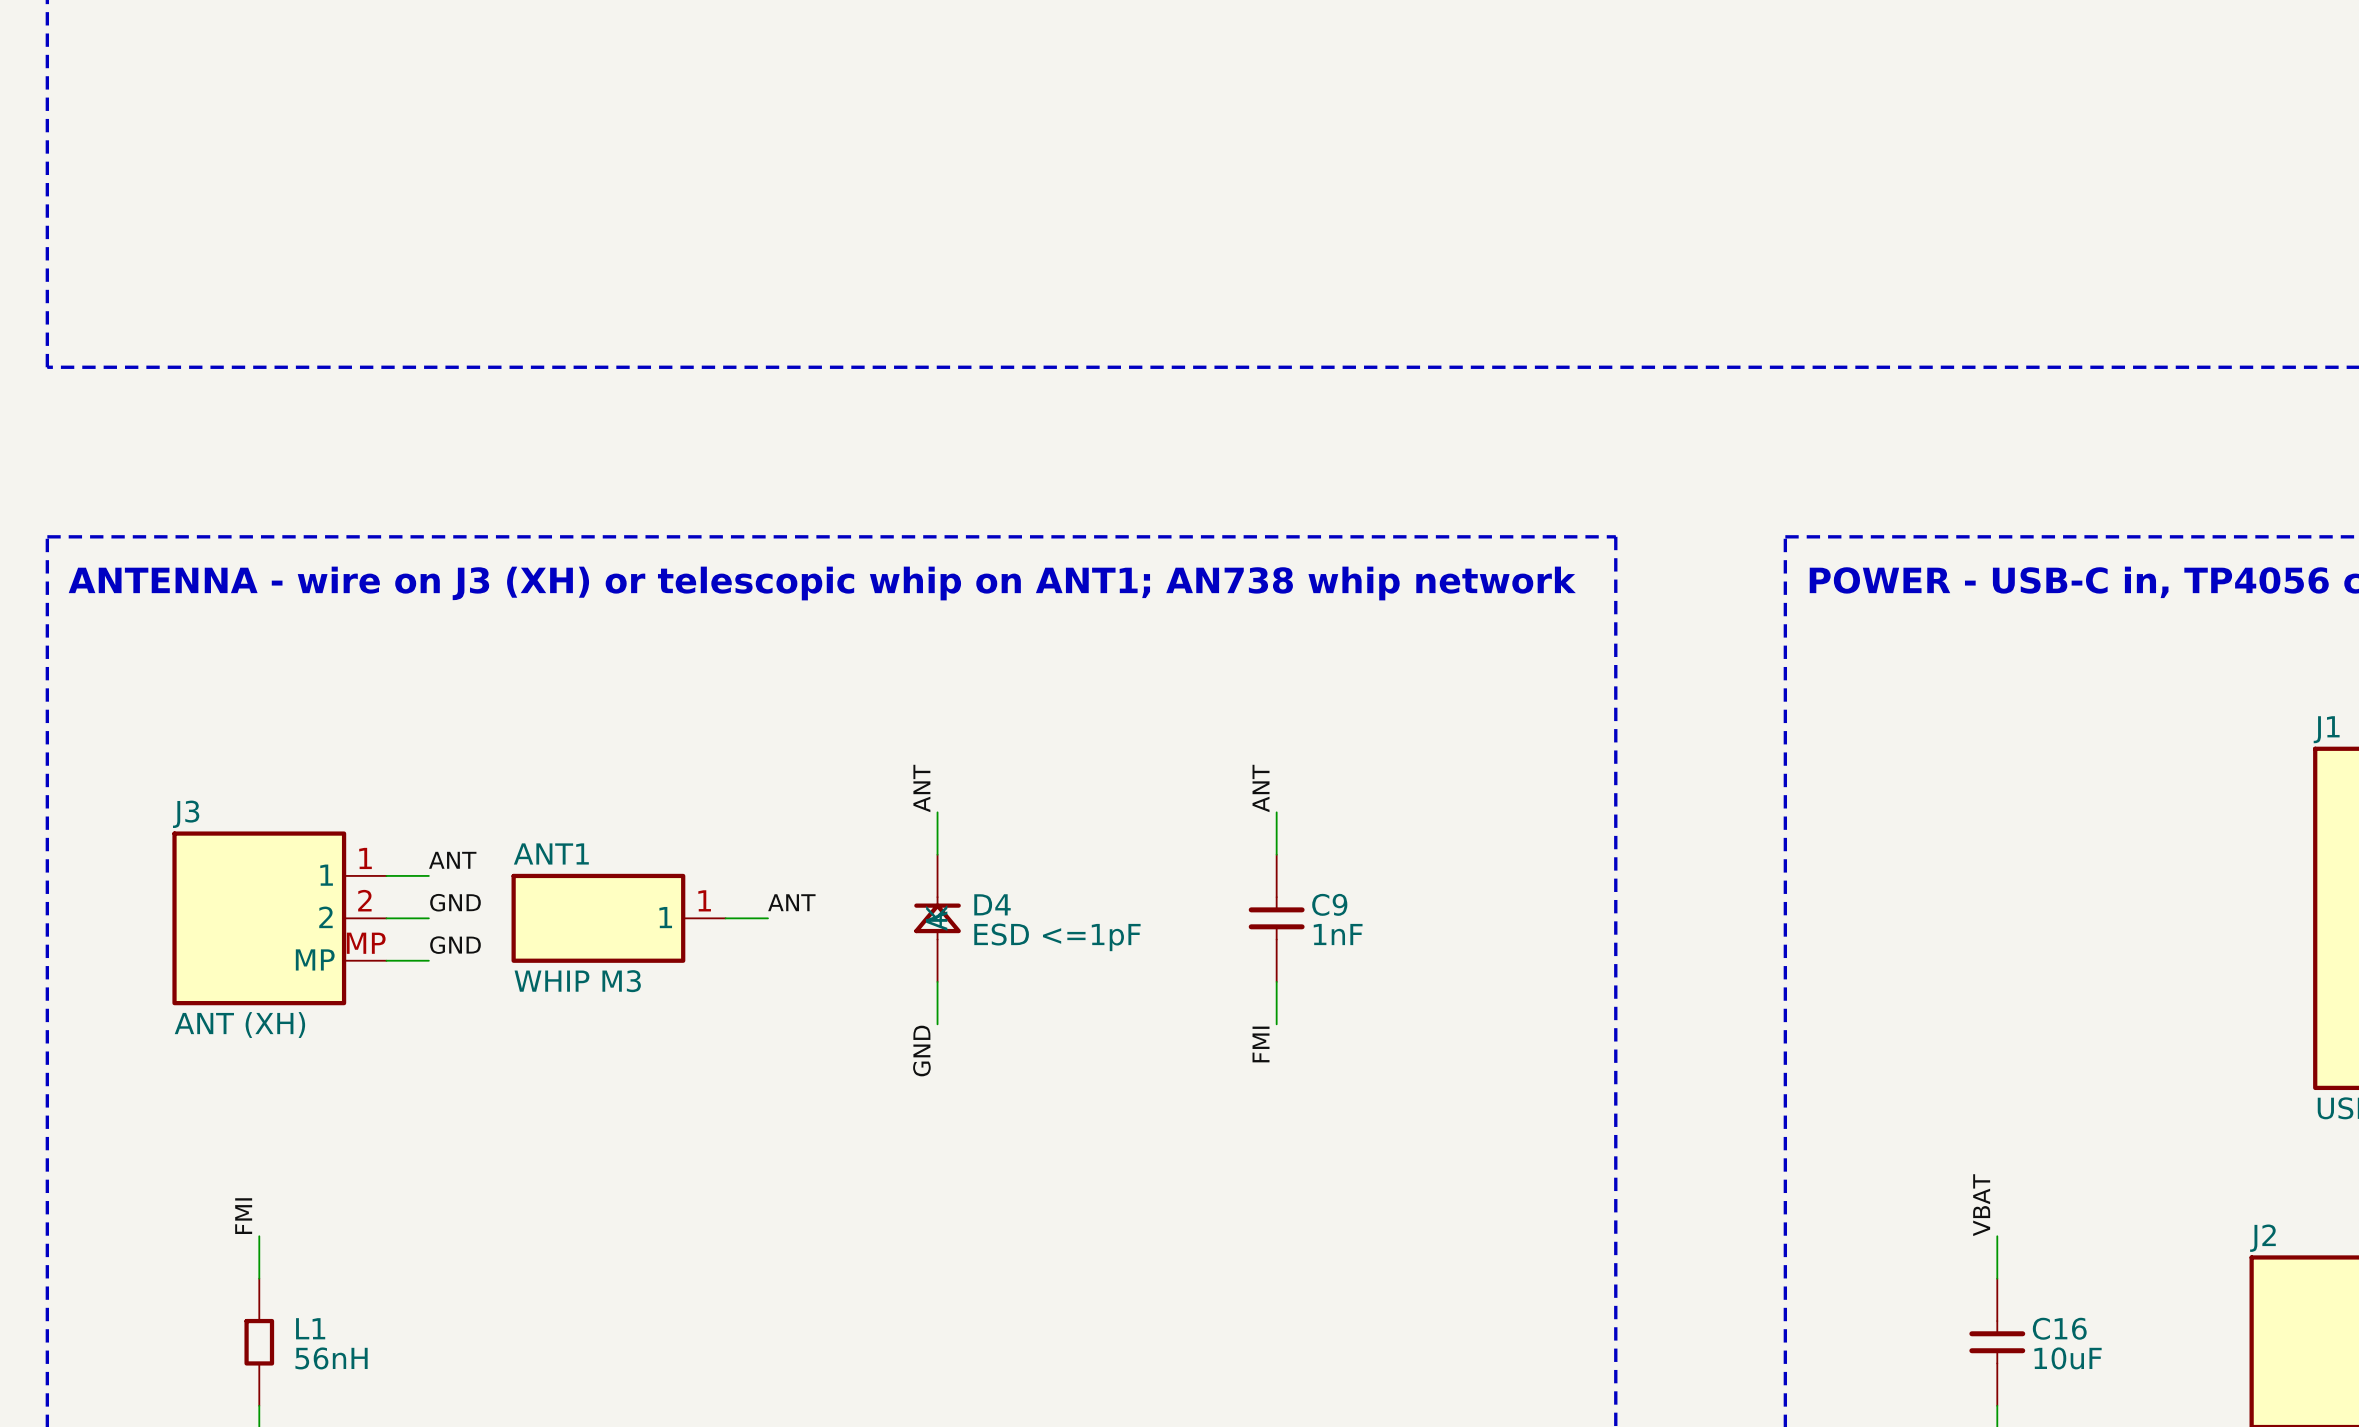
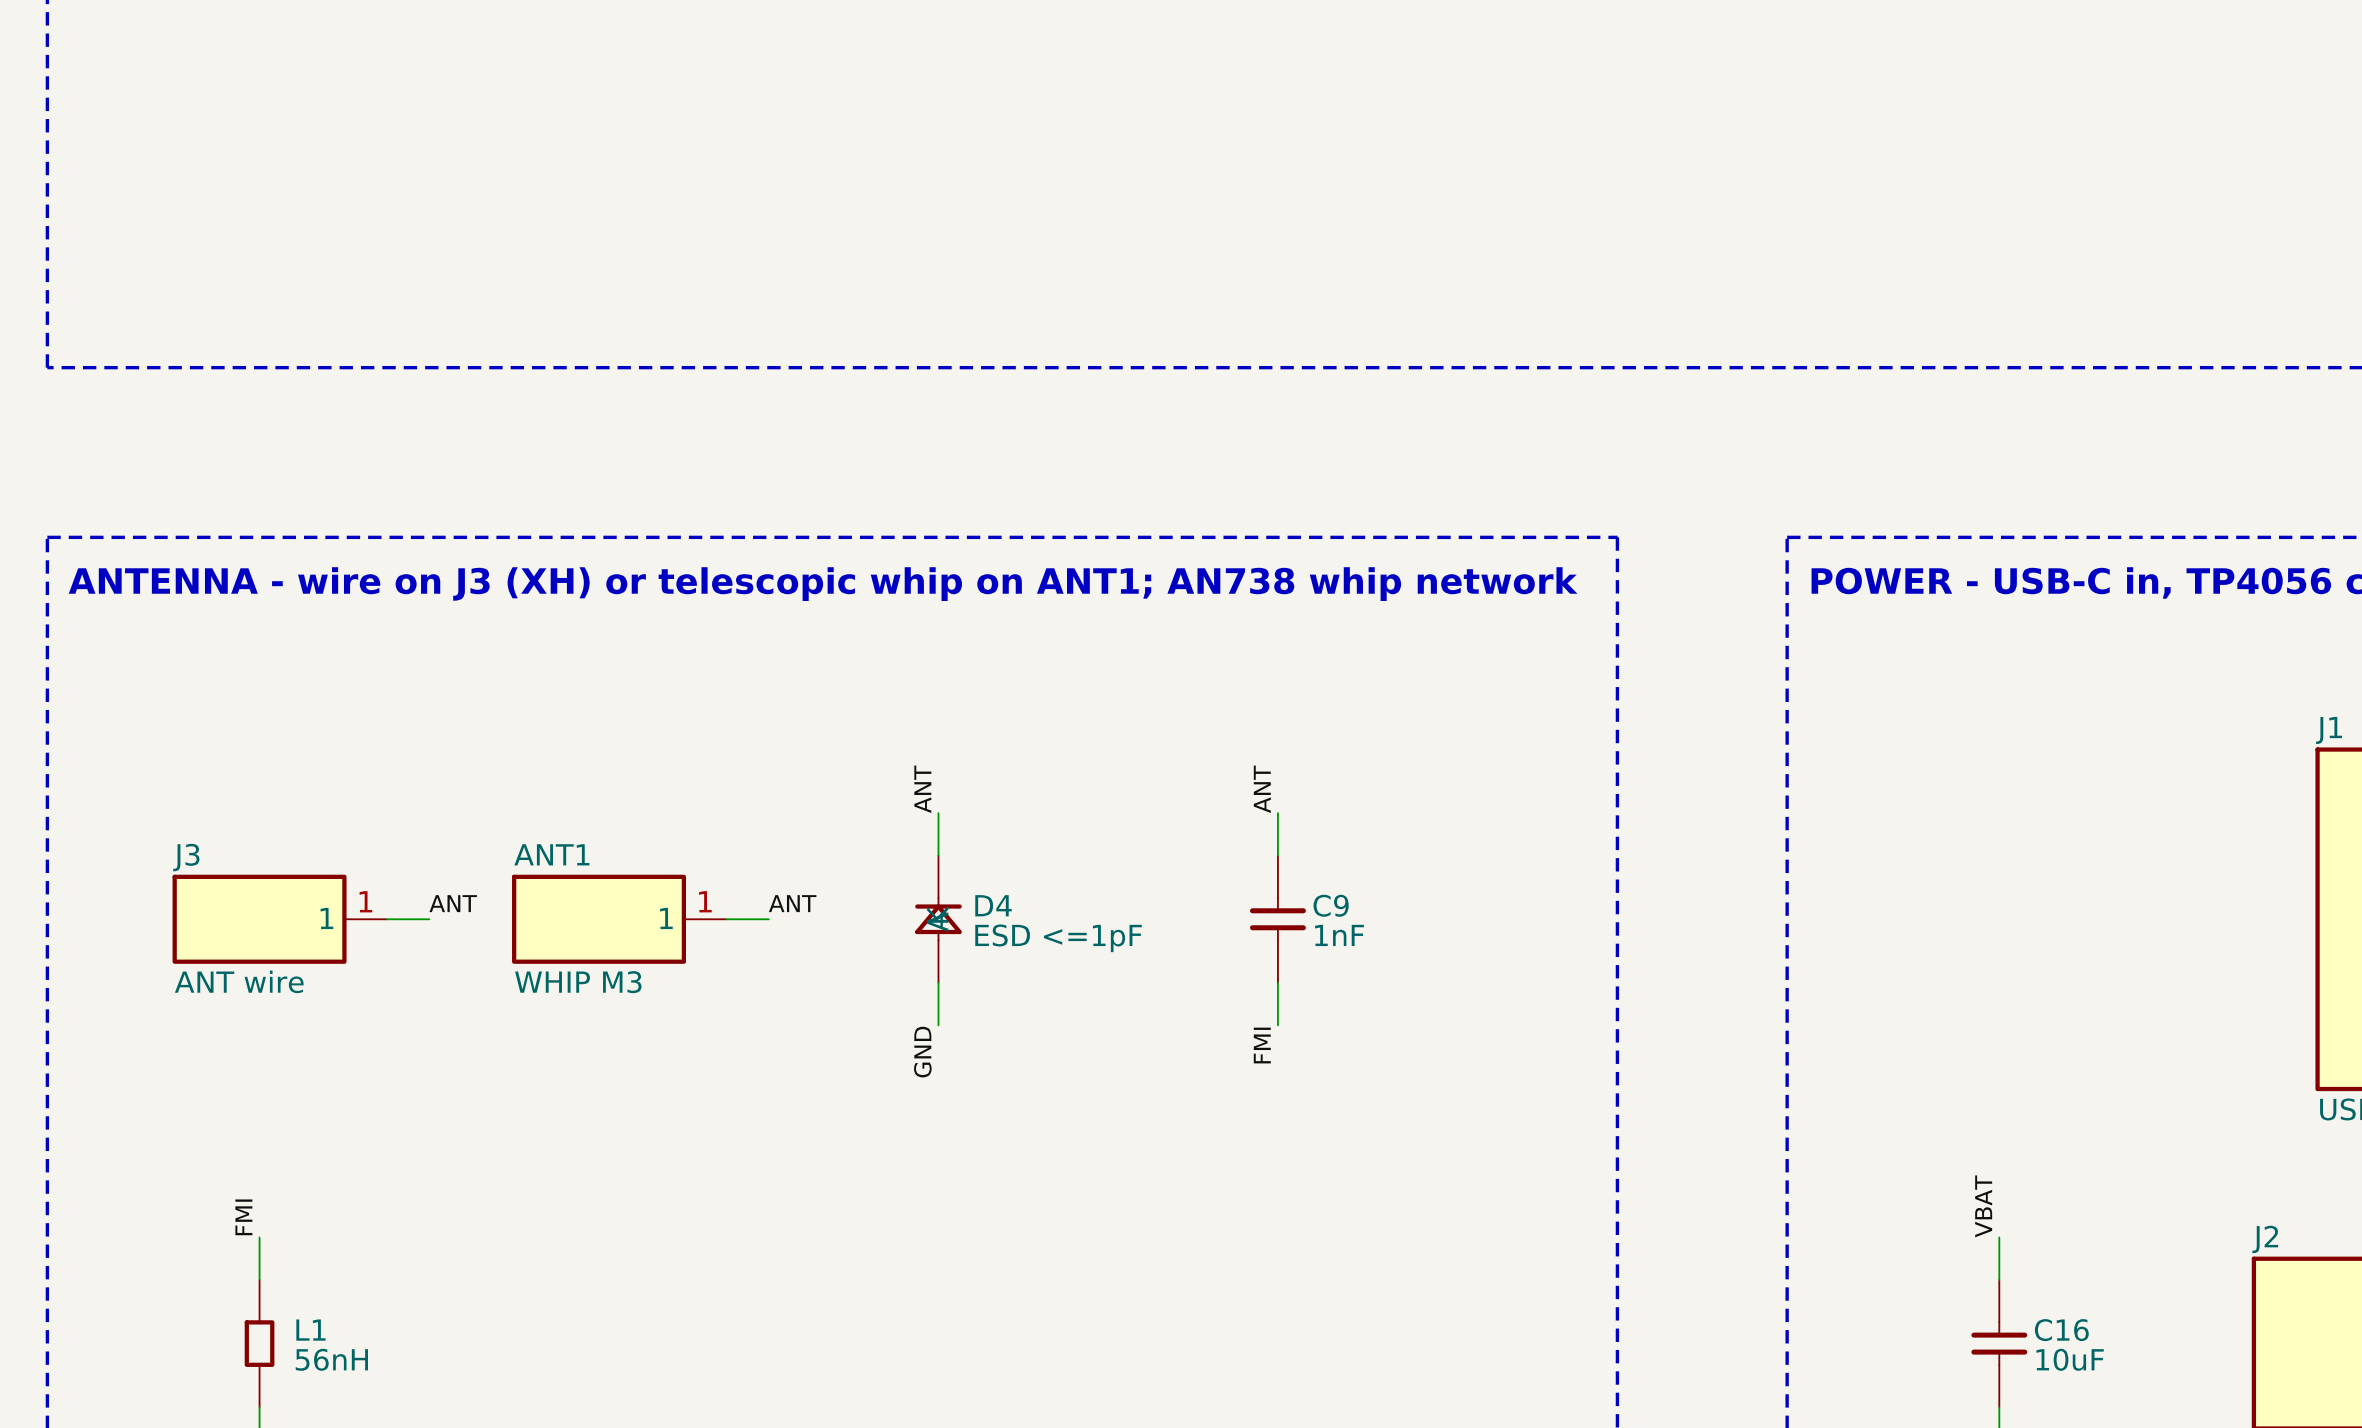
J3 name position: J3 (186, 814) -> J3 (186, 857)
J3 symbol: [172, 831, 387, 1006] -> [172, 874, 387, 964]
label: ANT (452, 860) -> none
wire: (386, 875) (428, 875) -> none
label: GND (455, 902) -> ANT (453, 903)
label: GND (455, 945) -> none
wire: (386, 960) (428, 960) -> none
J3 value: ANT (XH) (239, 1025) -> ANT wire (239, 981)

